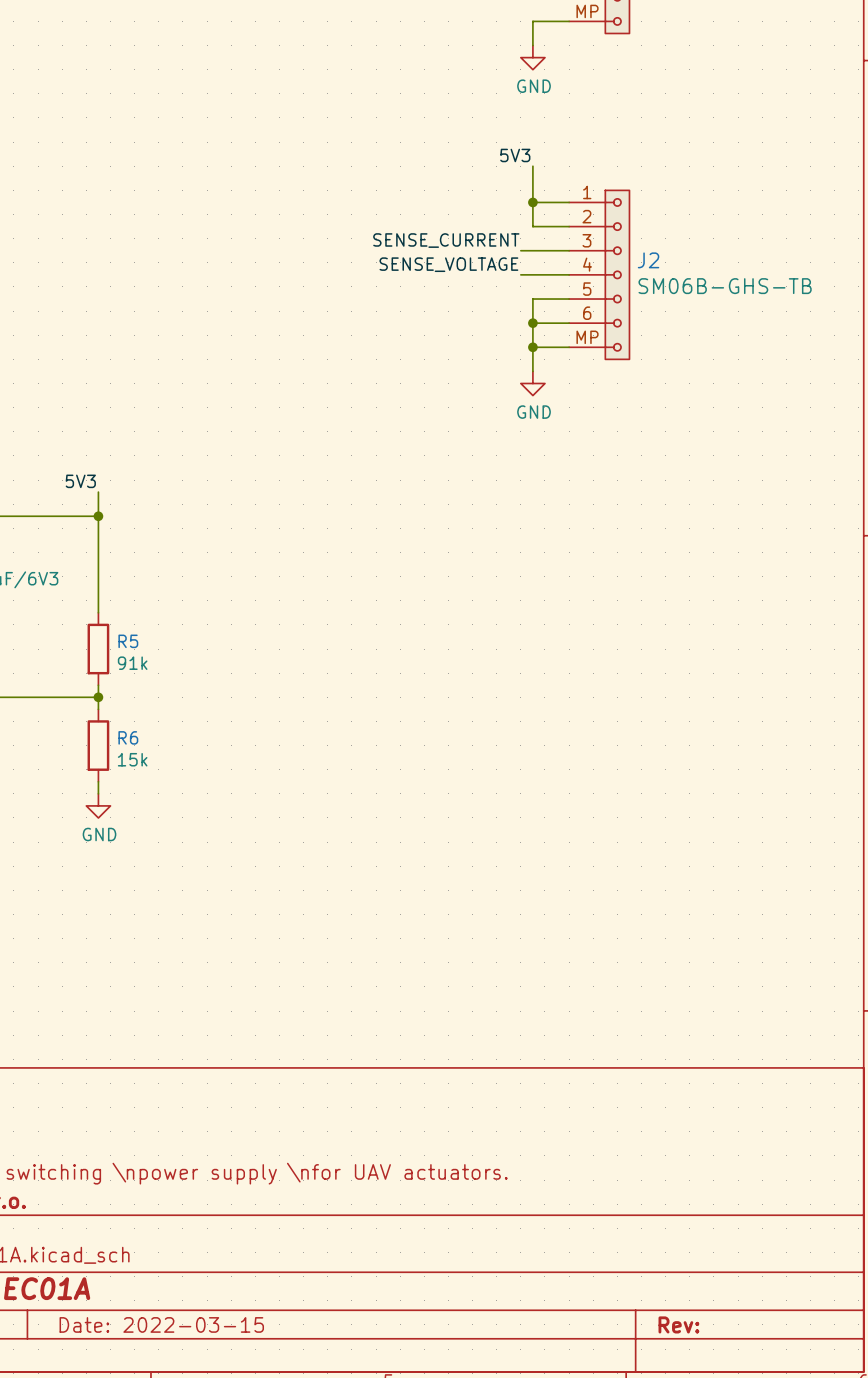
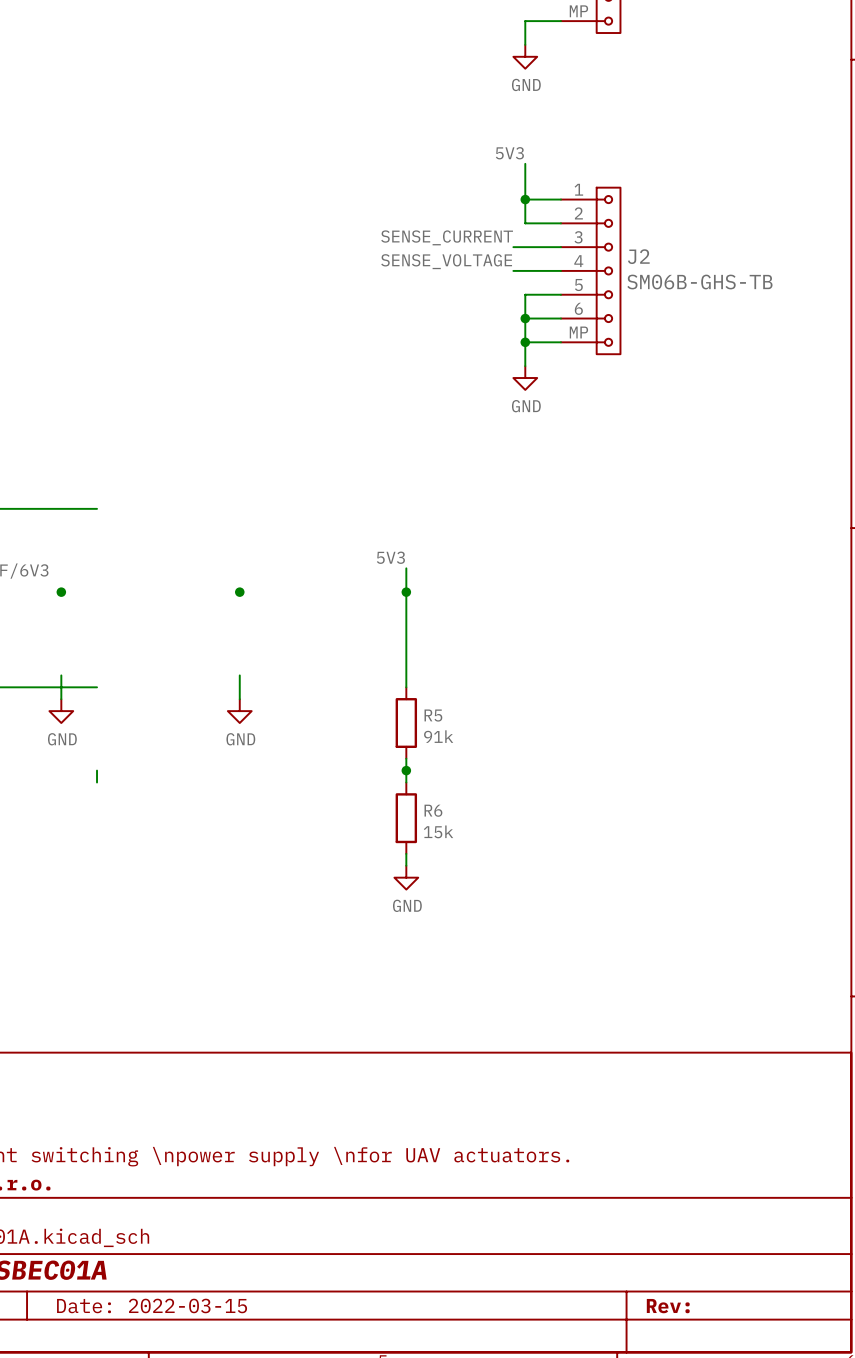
label: 5V3 (80, 481) -> none
wire: (98, 492) (98, 612) -> none
junction: (98, 516) -> none
label: none -> 5V3 (390, 557)
wire: none -> (406, 568) (406, 687)
junction: none -> (61, 592)
junction: none -> (239, 592)
junction: none -> (406, 592)
R5 position: (98, 649) -> (406, 723)
wire: (98, 685) (98, 709) -> (61, 675) (61, 699)
wire: none -> (239, 675) (239, 699)
junction: (98, 697) -> none
power symbol: none -> GND (61, 711)
power symbol: none -> GND (239, 711)
R6 position: (98, 745) -> (406, 818)
wire: none -> (406, 758) (406, 782)
junction: none -> (406, 770)
power symbol: GND (98, 805) -> none
wire: none -> (406, 853) (406, 865)
power symbol: none -> GND (406, 877)

